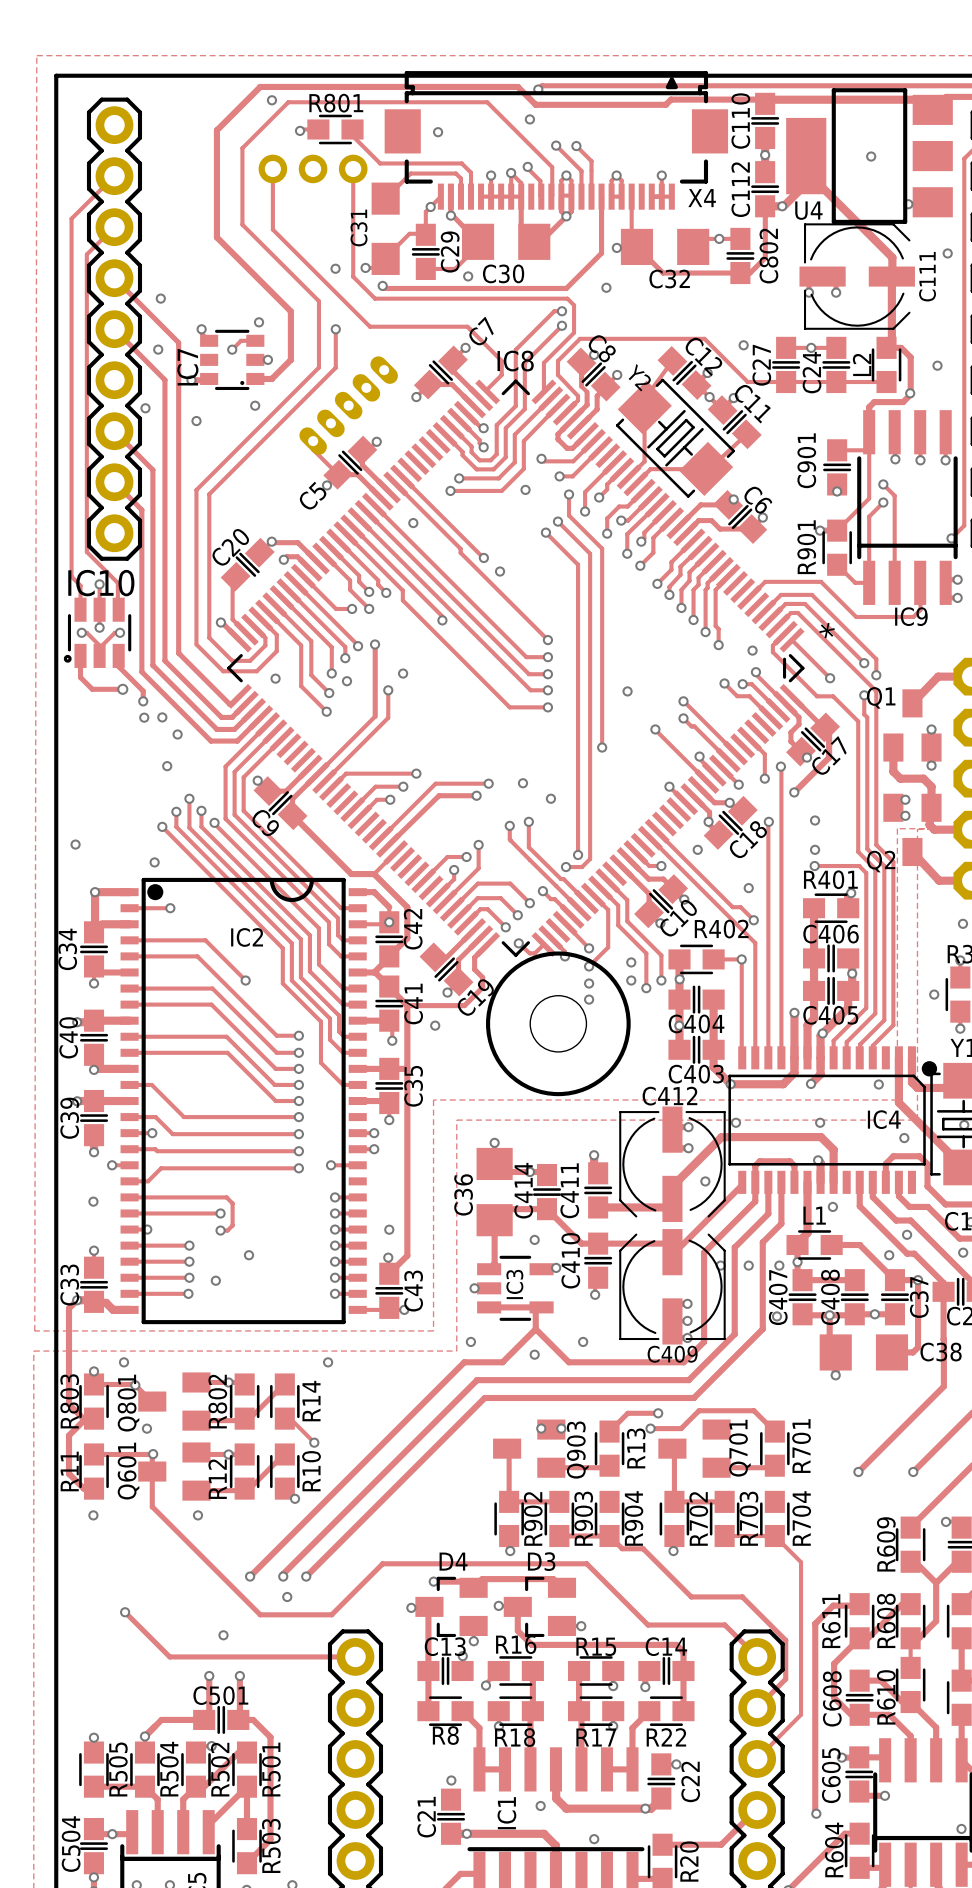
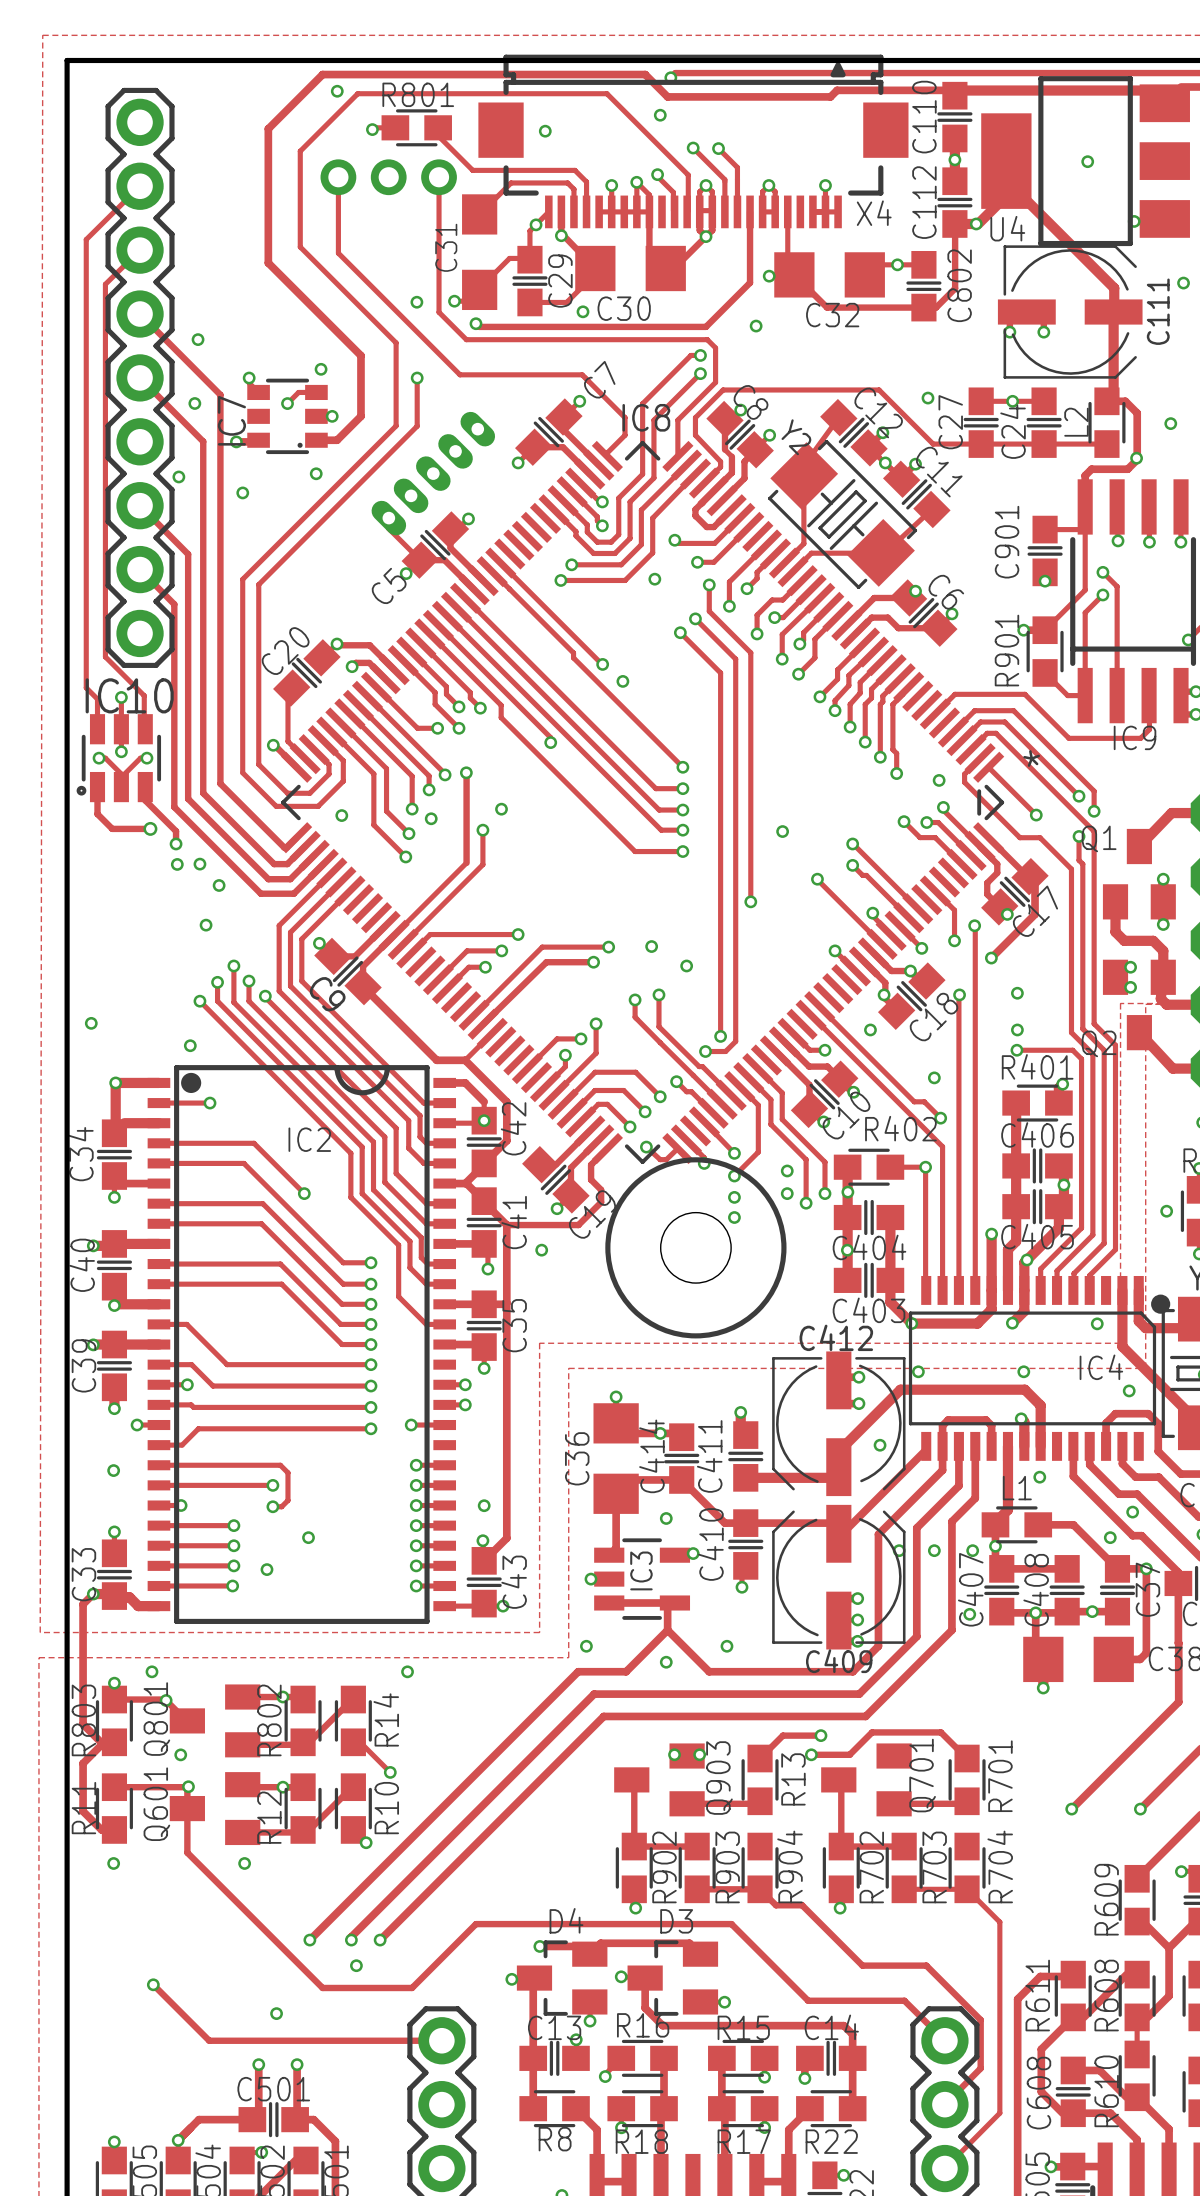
via: (413, 523) -> none

